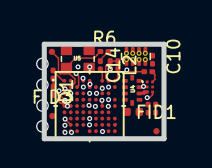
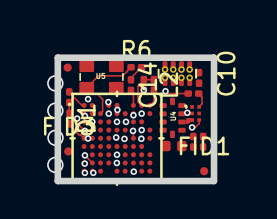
track: (51, 51) (58, 58) (58, 72) (69, 73) (74, 78) (74, 82) (70, 87) -> none
via: (78, 66) -> none
via: (89, 66) -> none
via: (76, 73) -> none
via: none -> (88, 99)

